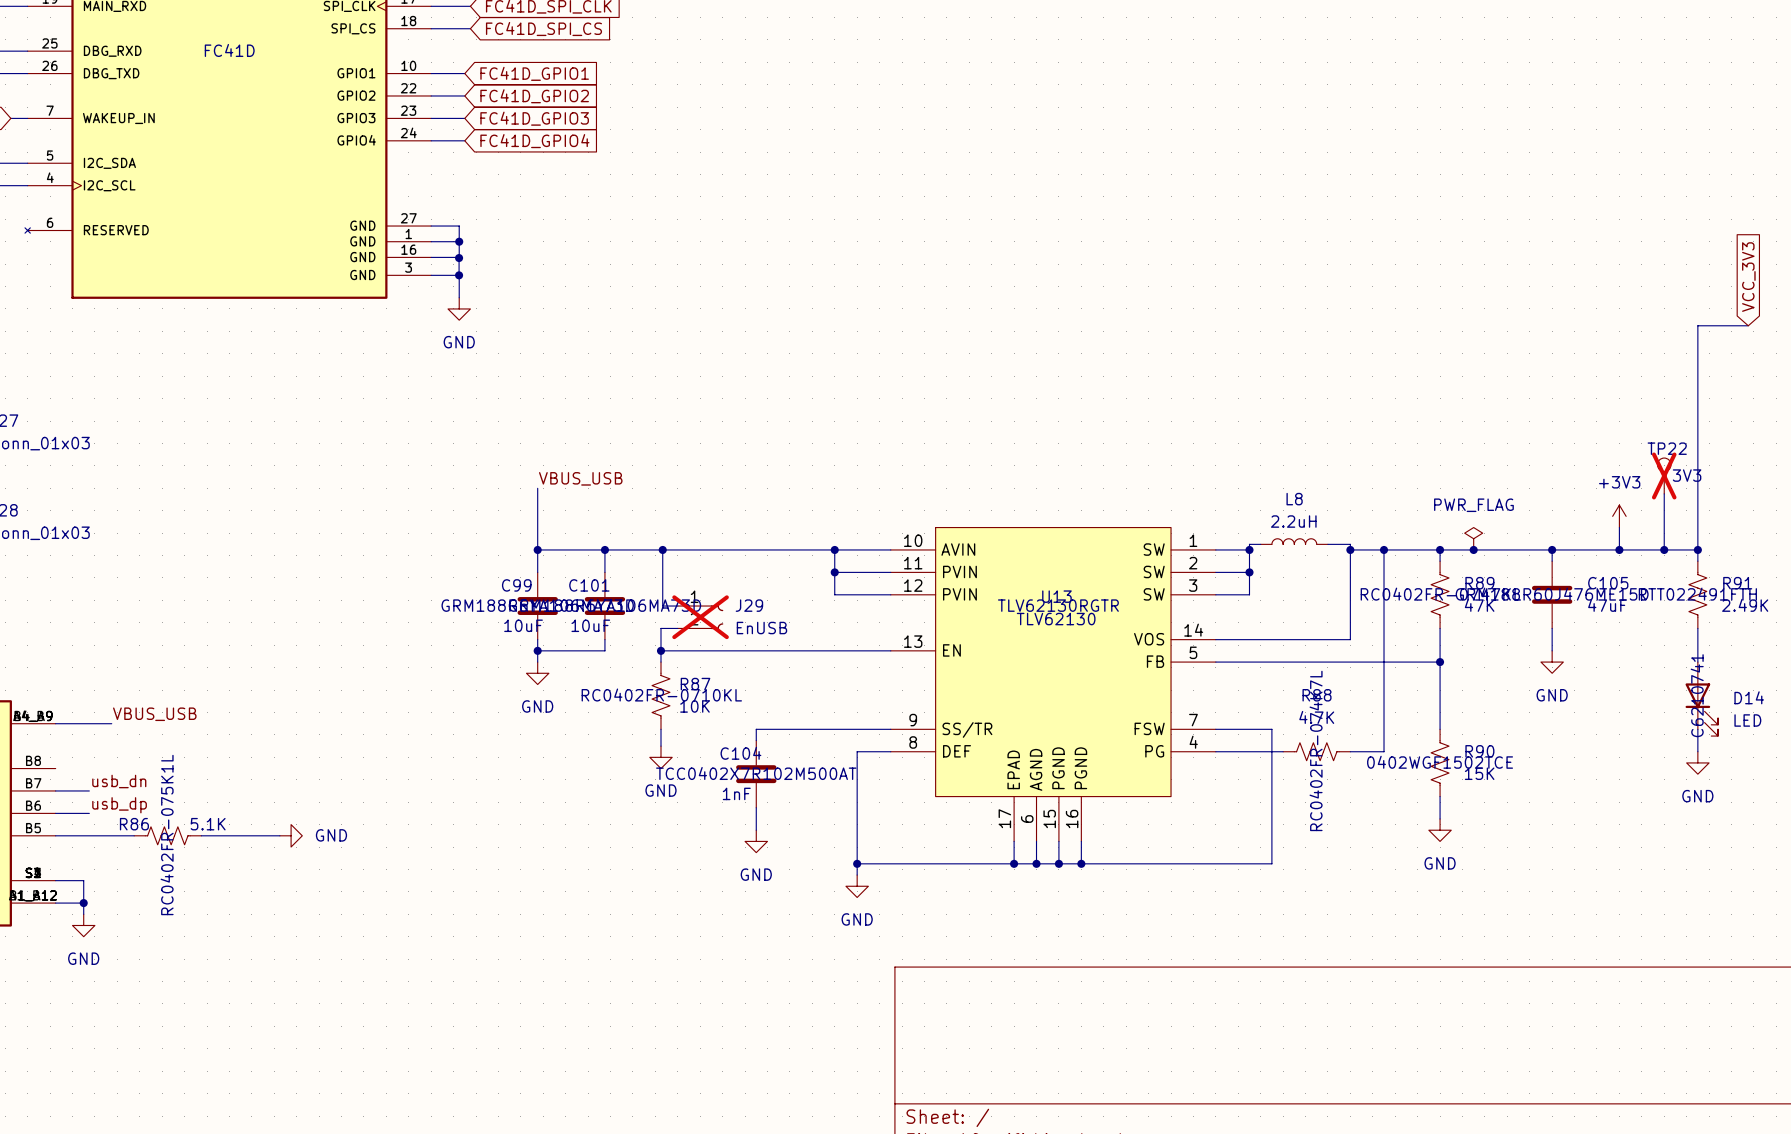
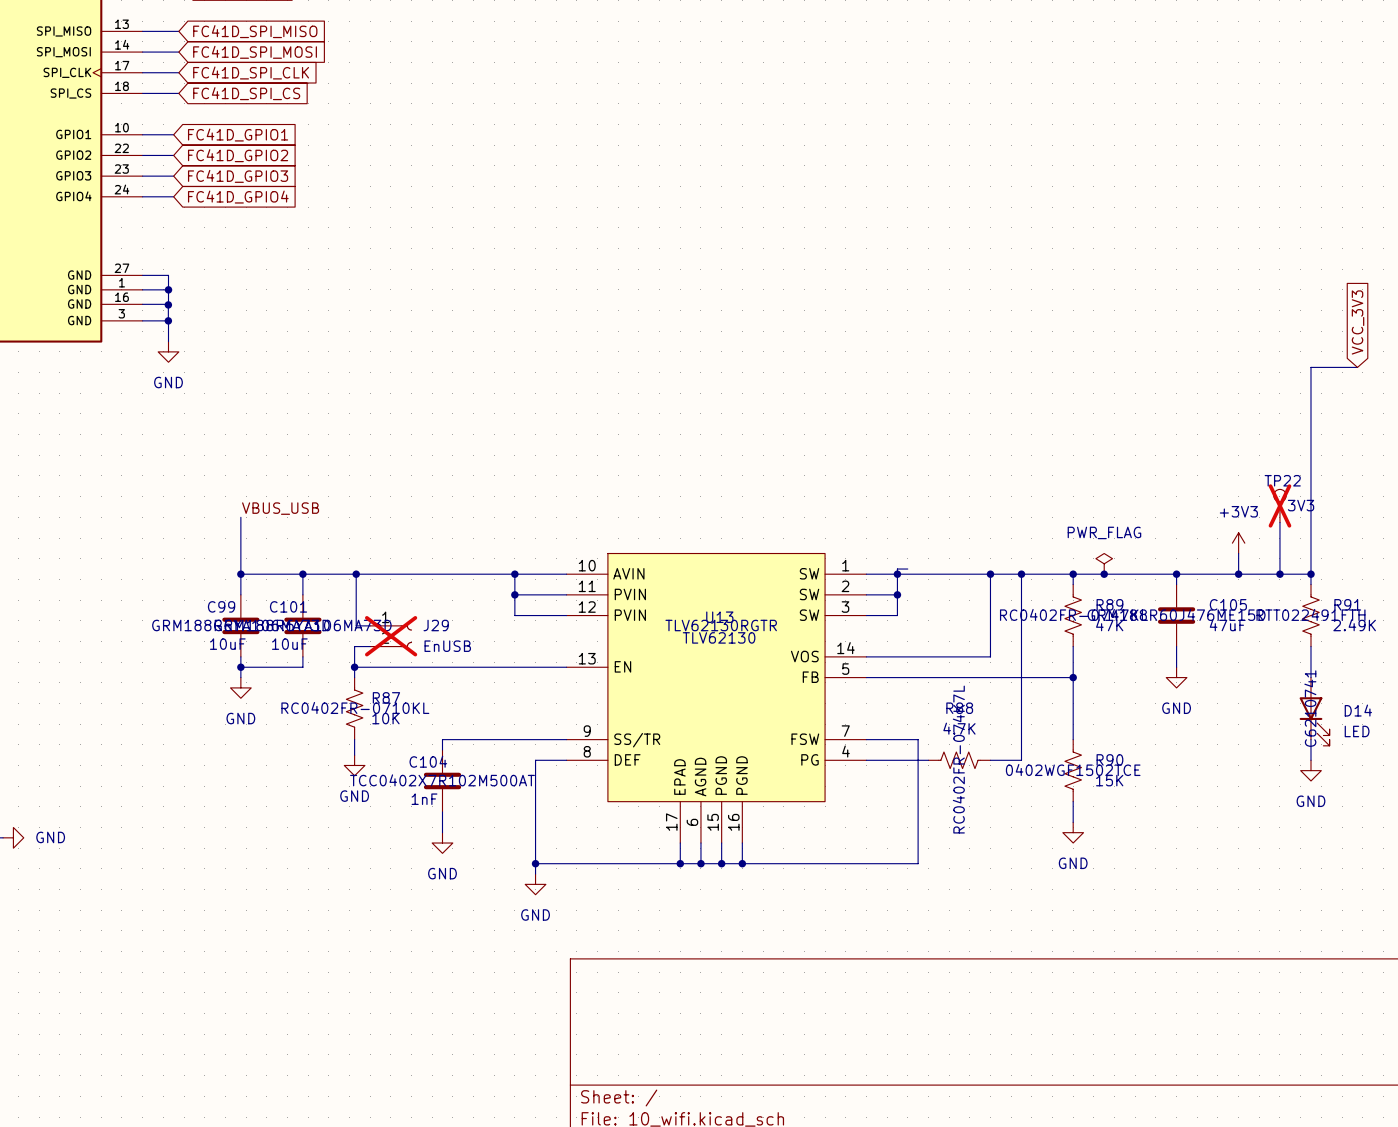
L8: 2.2uH (1294, 541) -> none
wire: (1327, 544) (1350, 544) (1350, 549) -> (897, 574) (990, 574)

